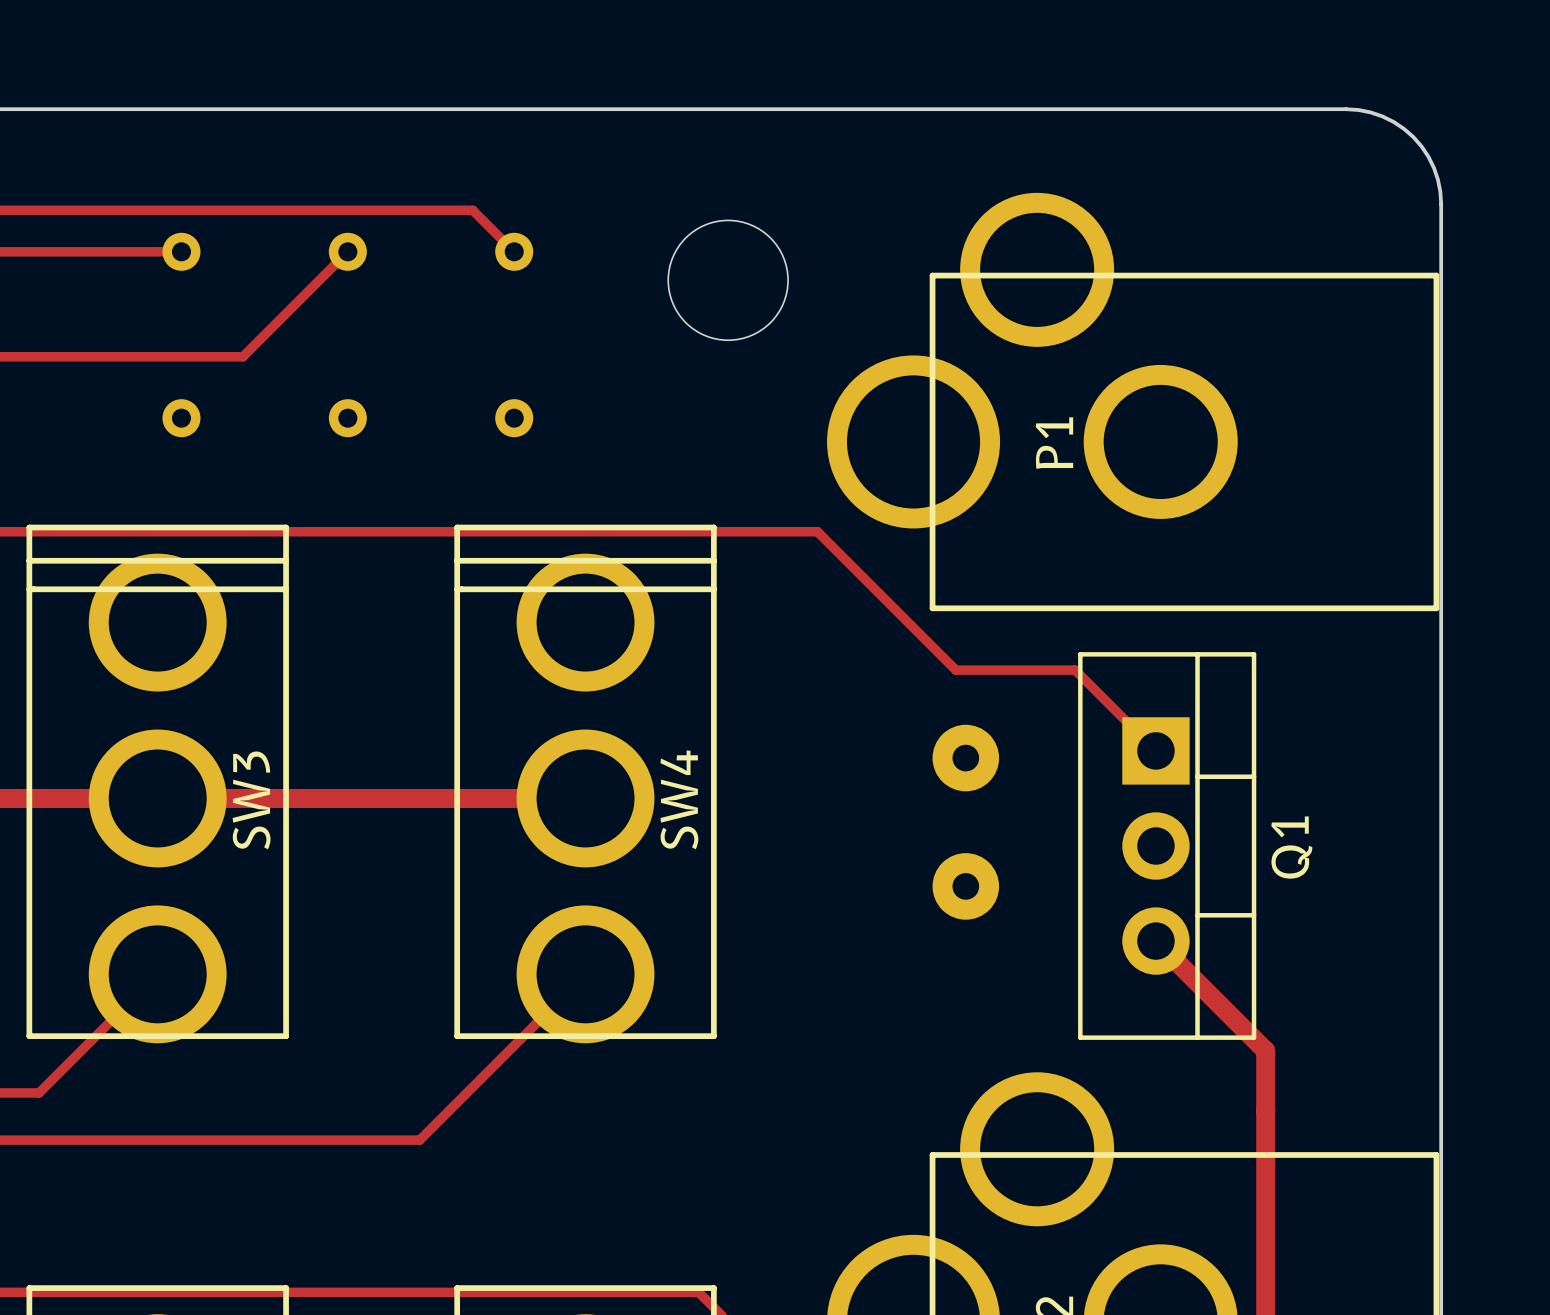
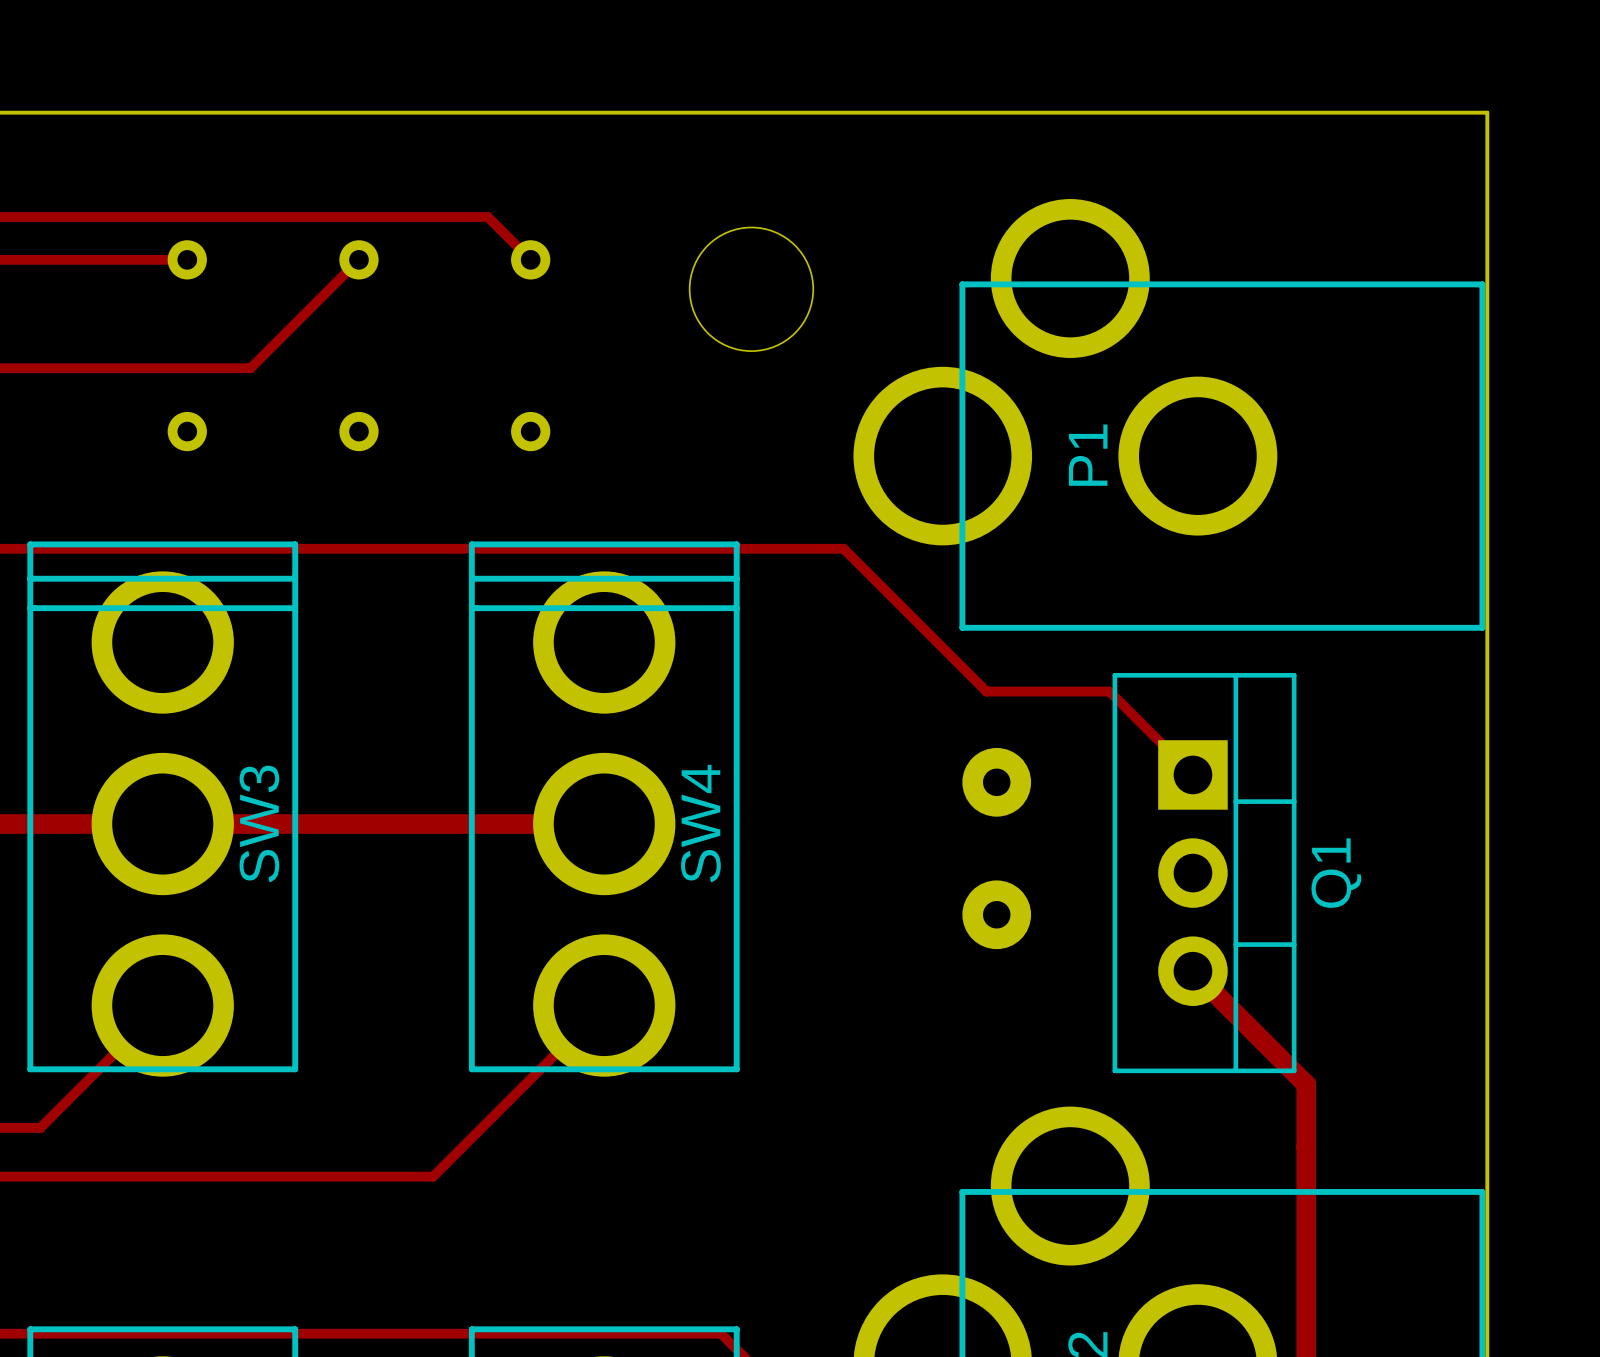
board edge: (1346, 109) (1358, 110) (1382, 116) (1393, 121) (1413, 137) (1428, 156) (1433, 167) (1440, 191) (1441, 204) -> (1389, 112) (1487, 112) (1487, 210)

